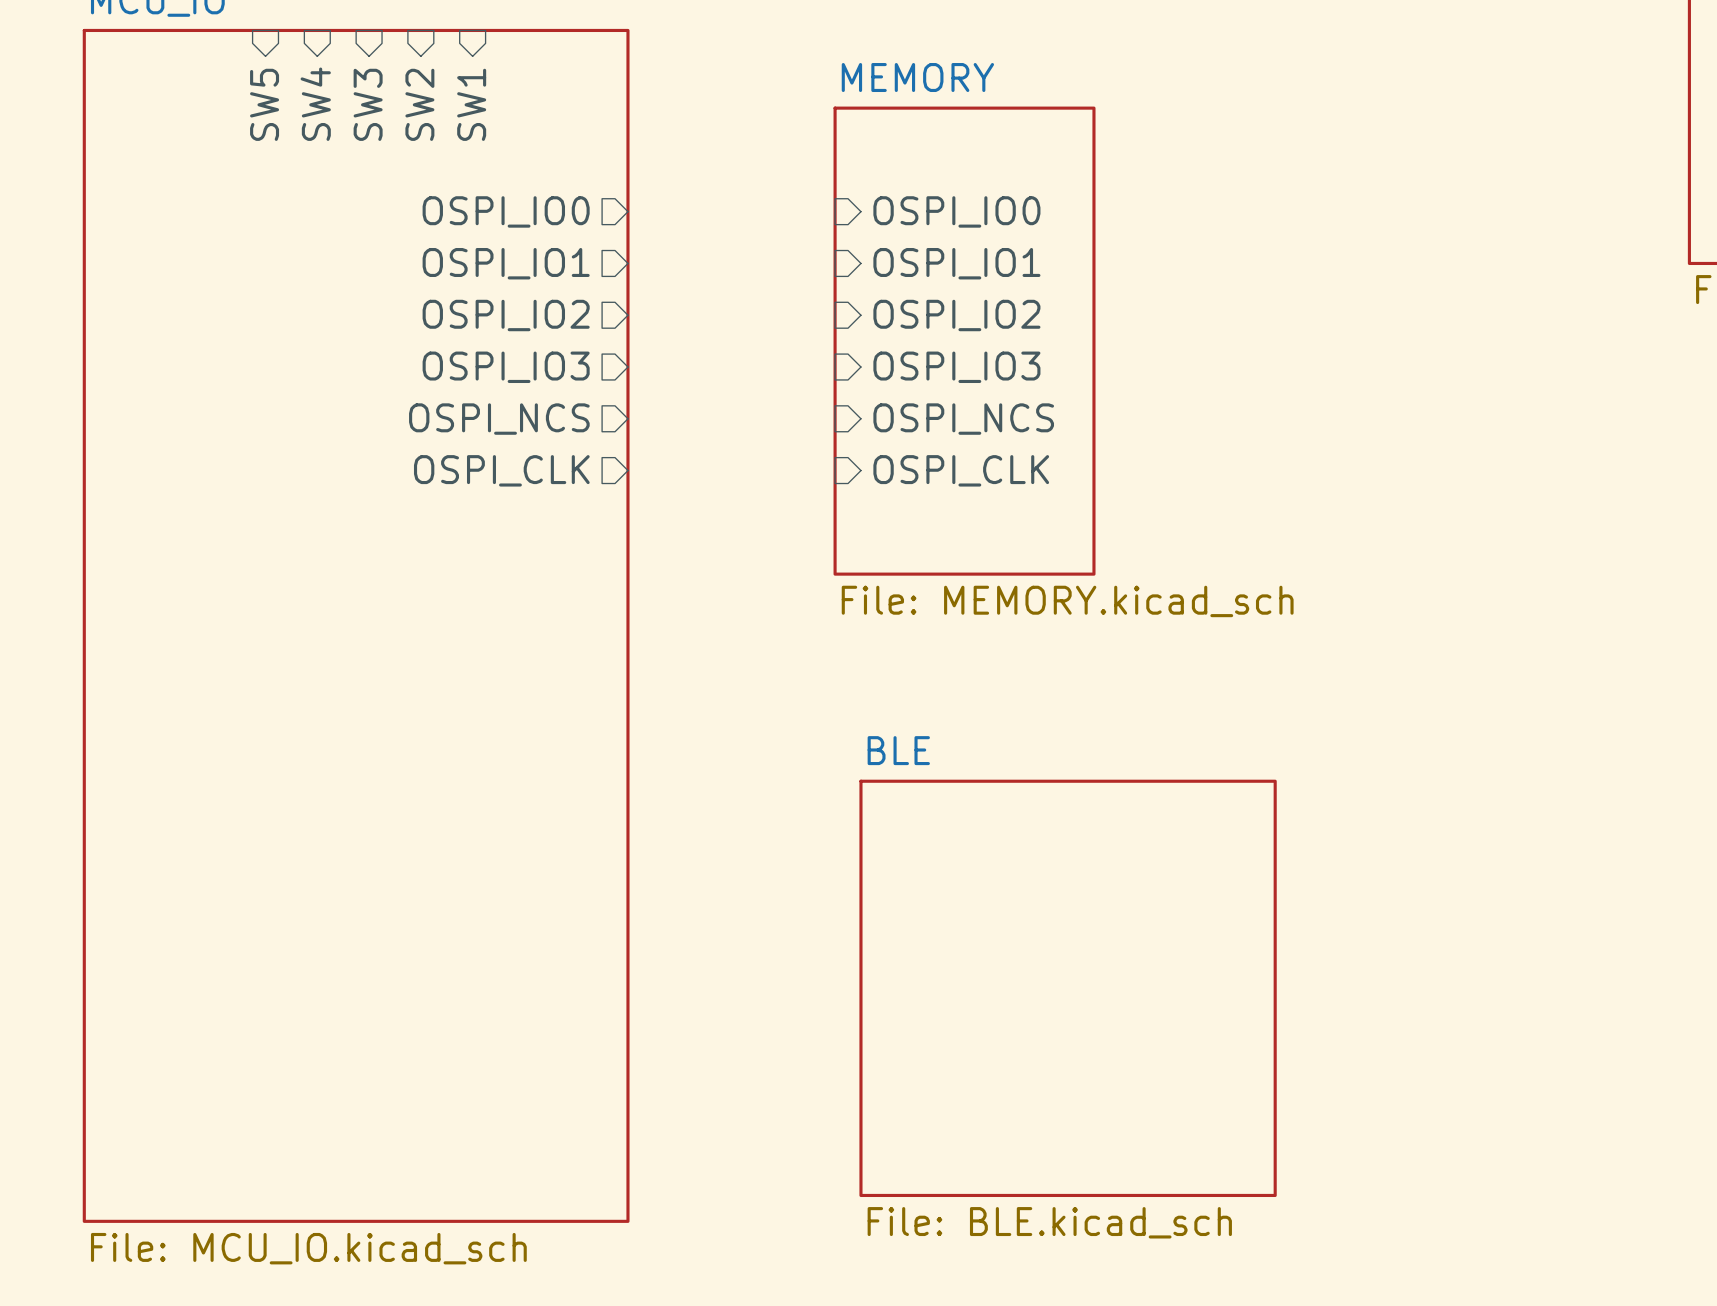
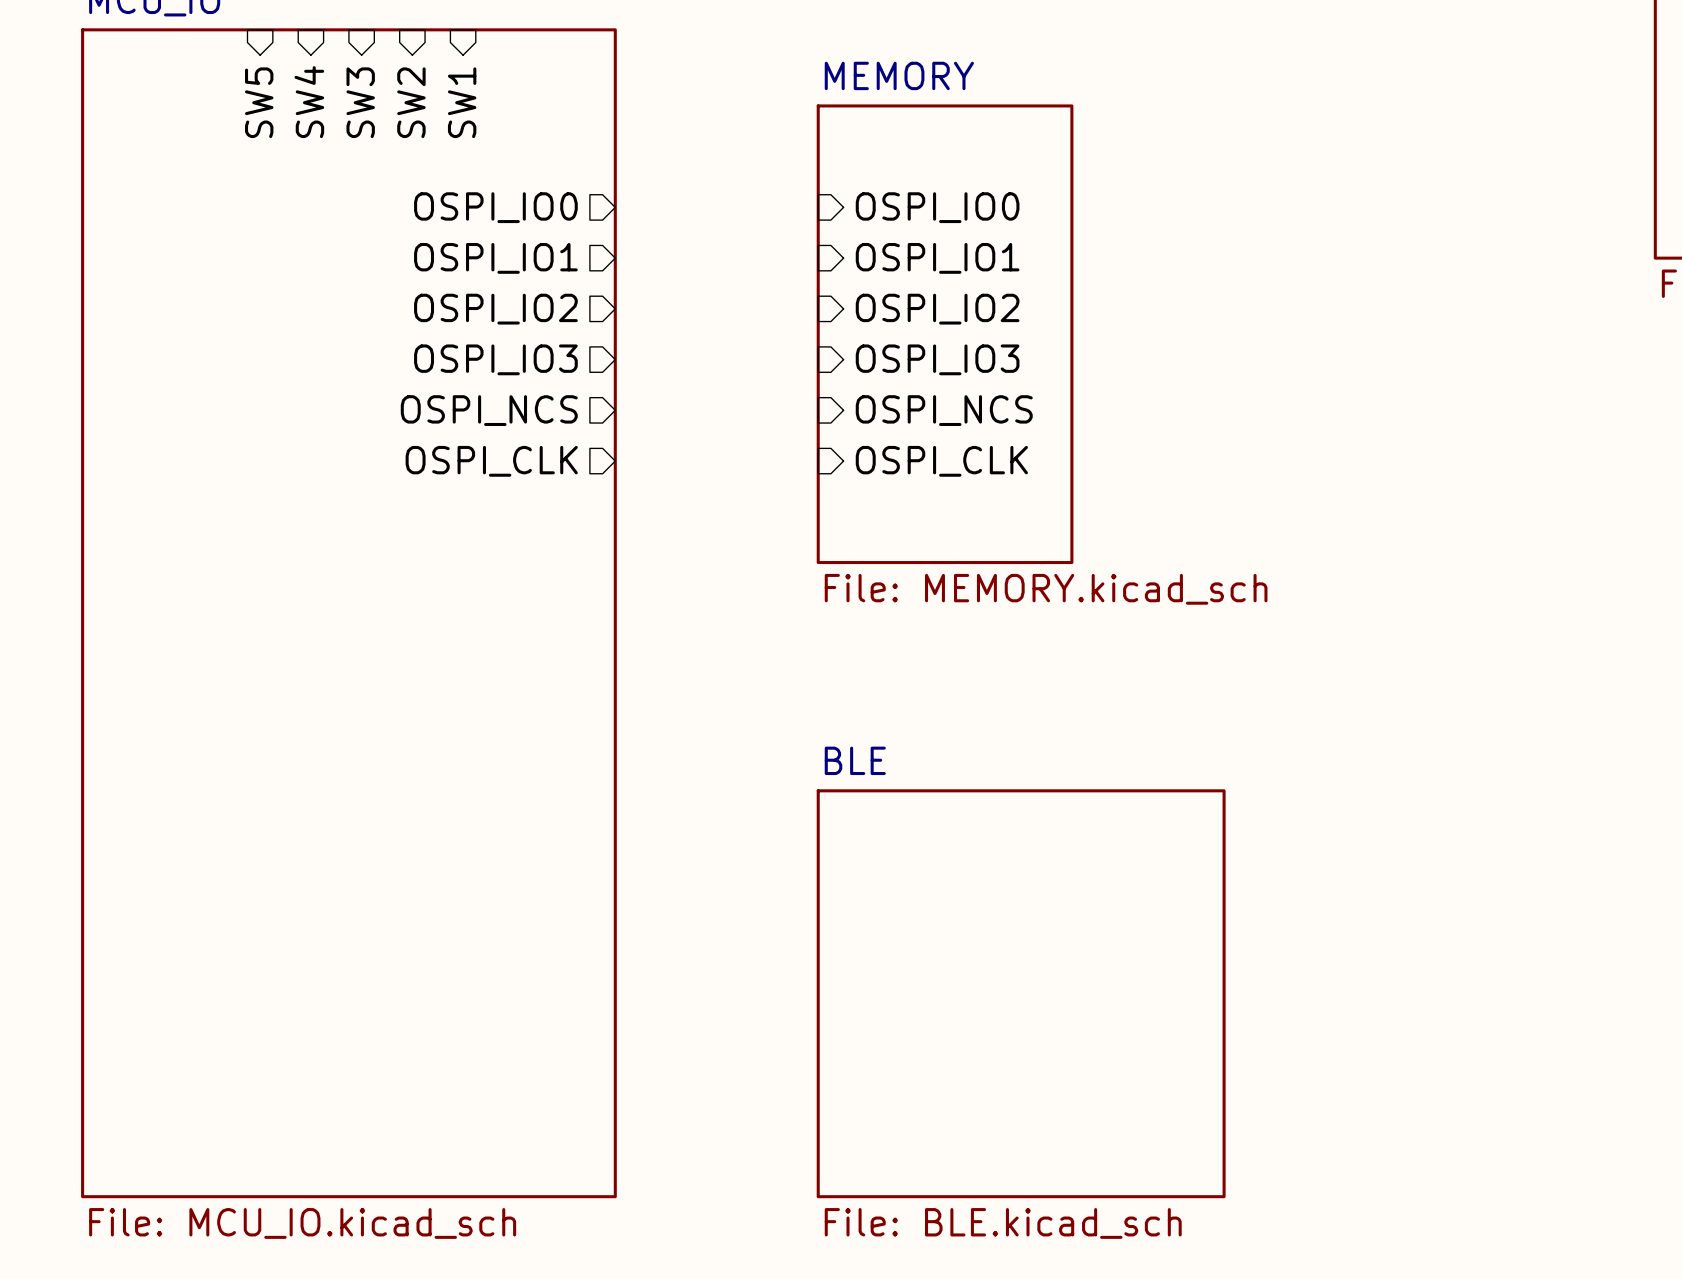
sheet BLE position: (1068, 988) -> (1021, 993)

